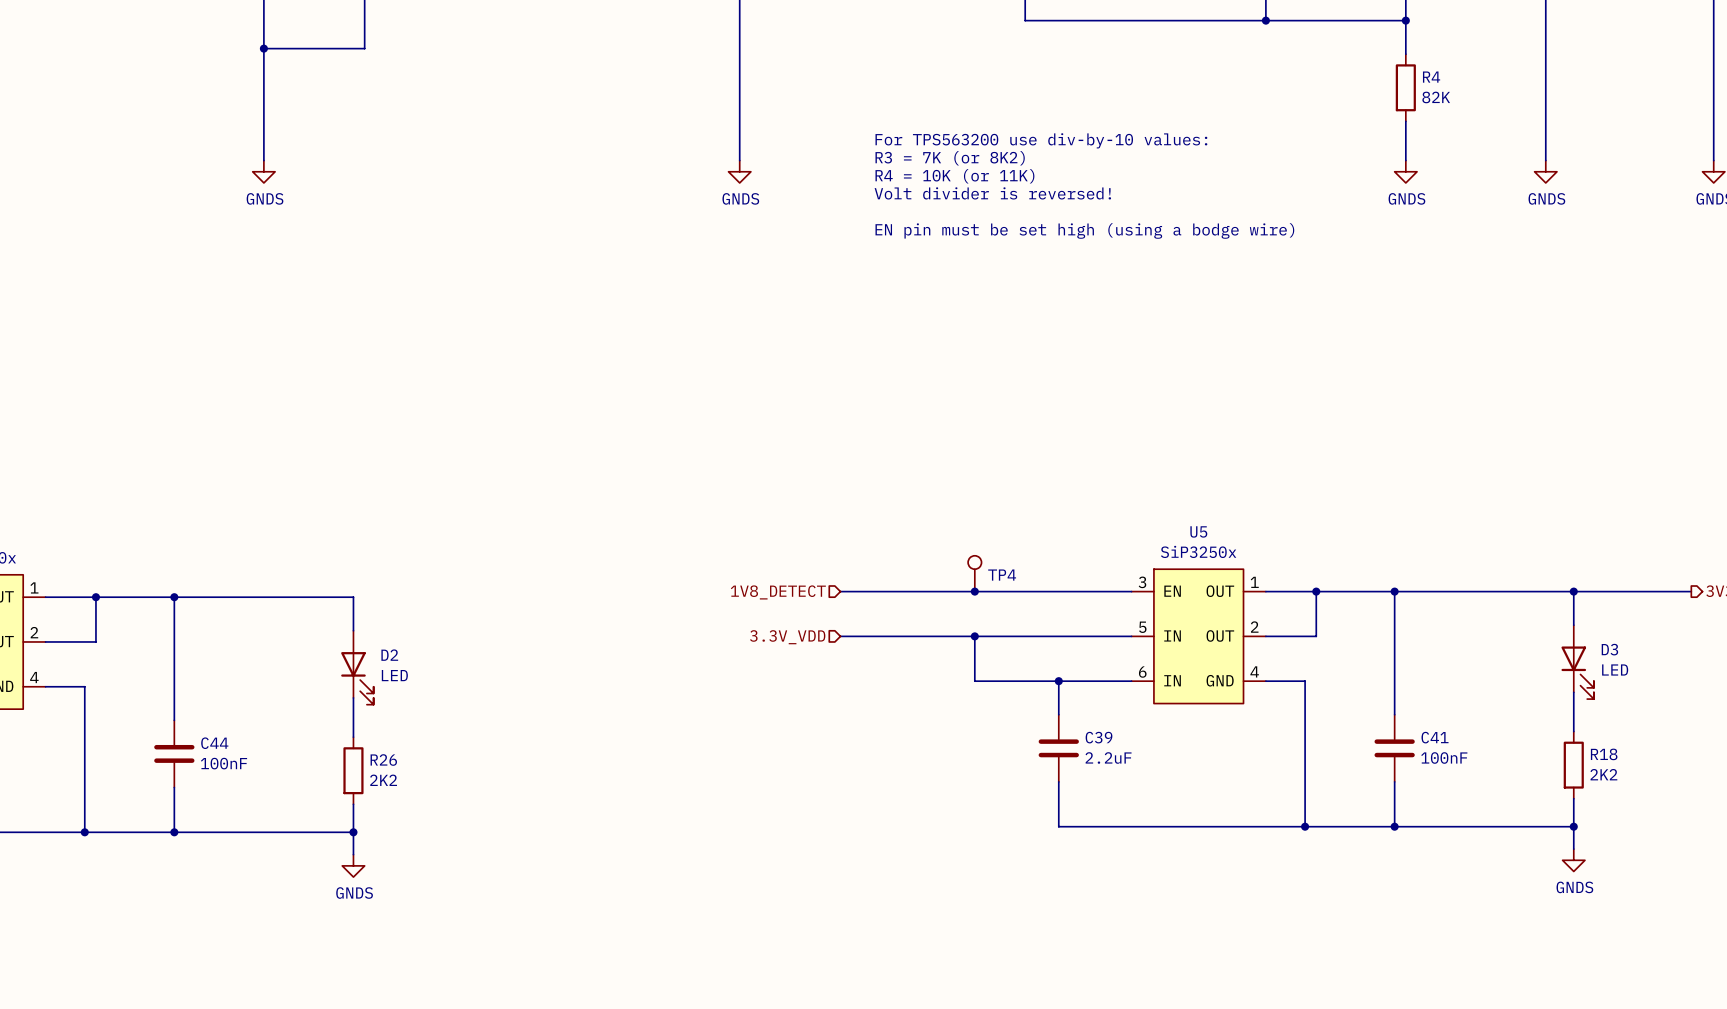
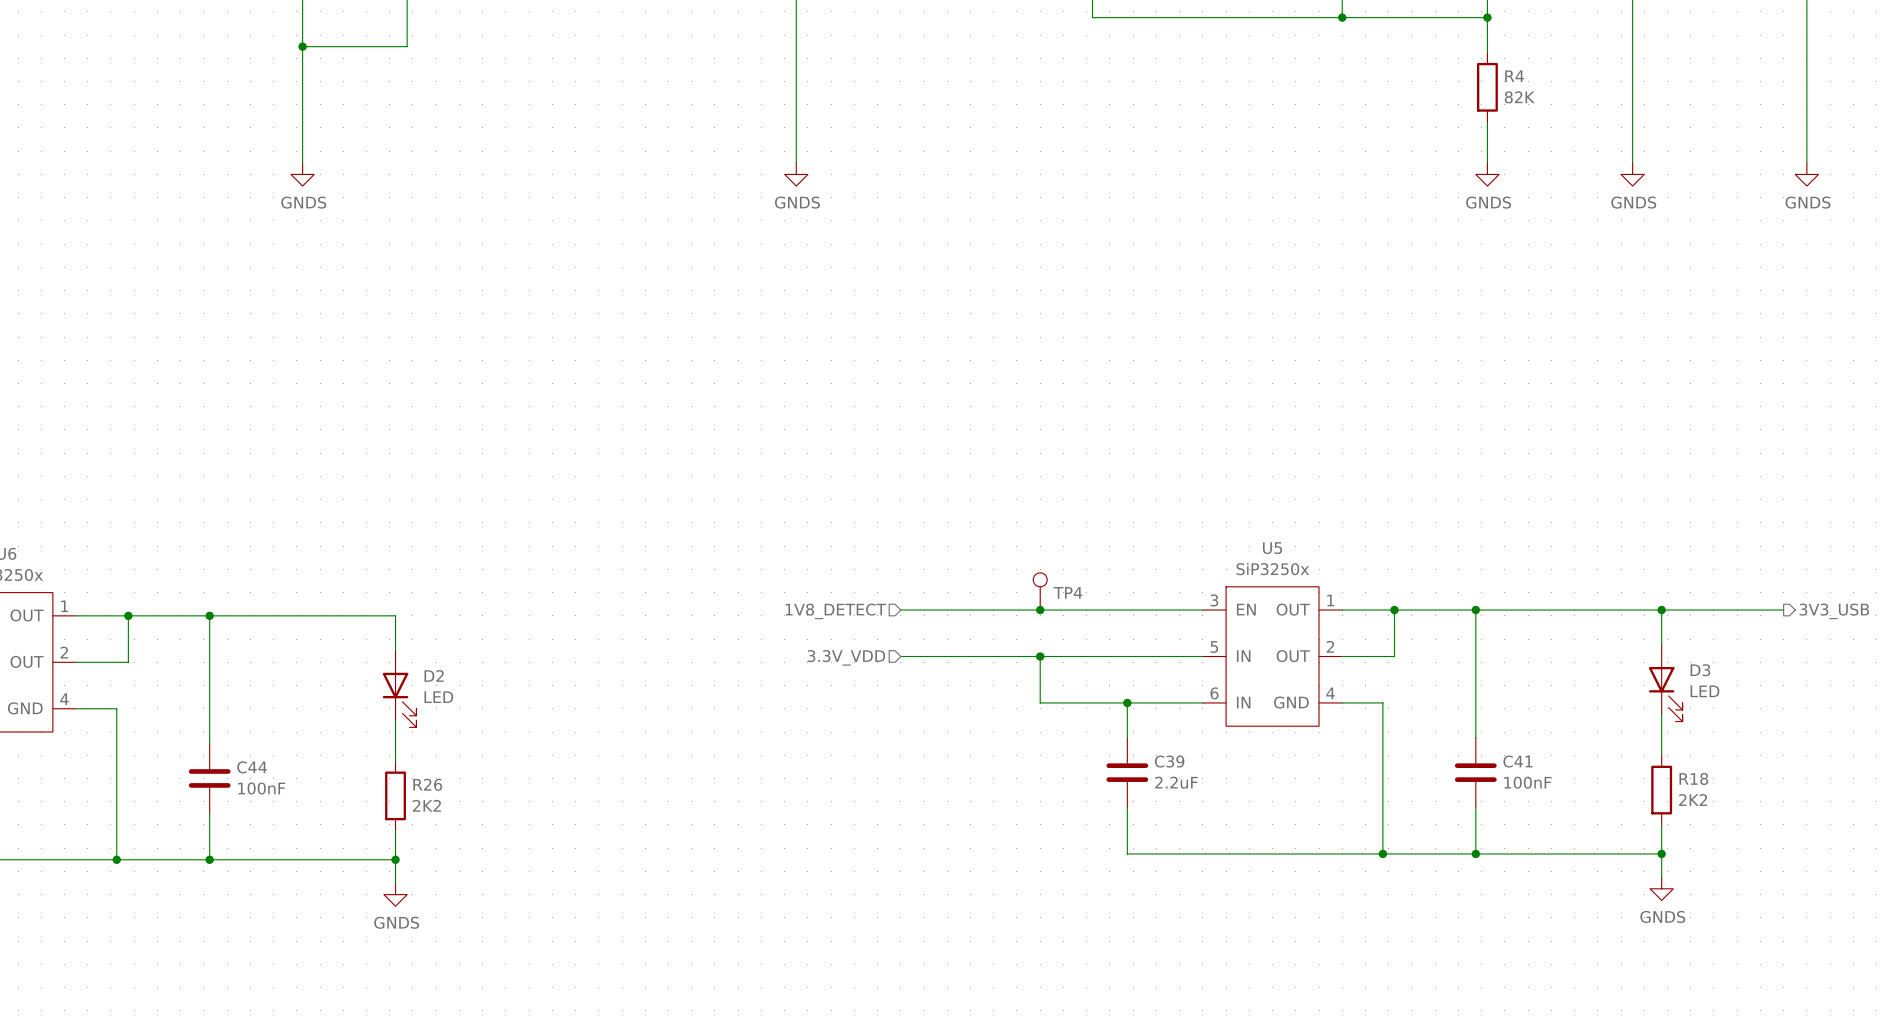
text: For TPS563200 use div-by-10 values: (1041, 140) -> none
text: R3 = 7K (or 8K2) (950, 158) -> none
text: R4 = 10K (or 11K) (954, 176) -> none
text: Volt divider is reversed! (992, 193) -> none
text: EN pin must be set high (using a bodge wire) (1084, 230) -> none

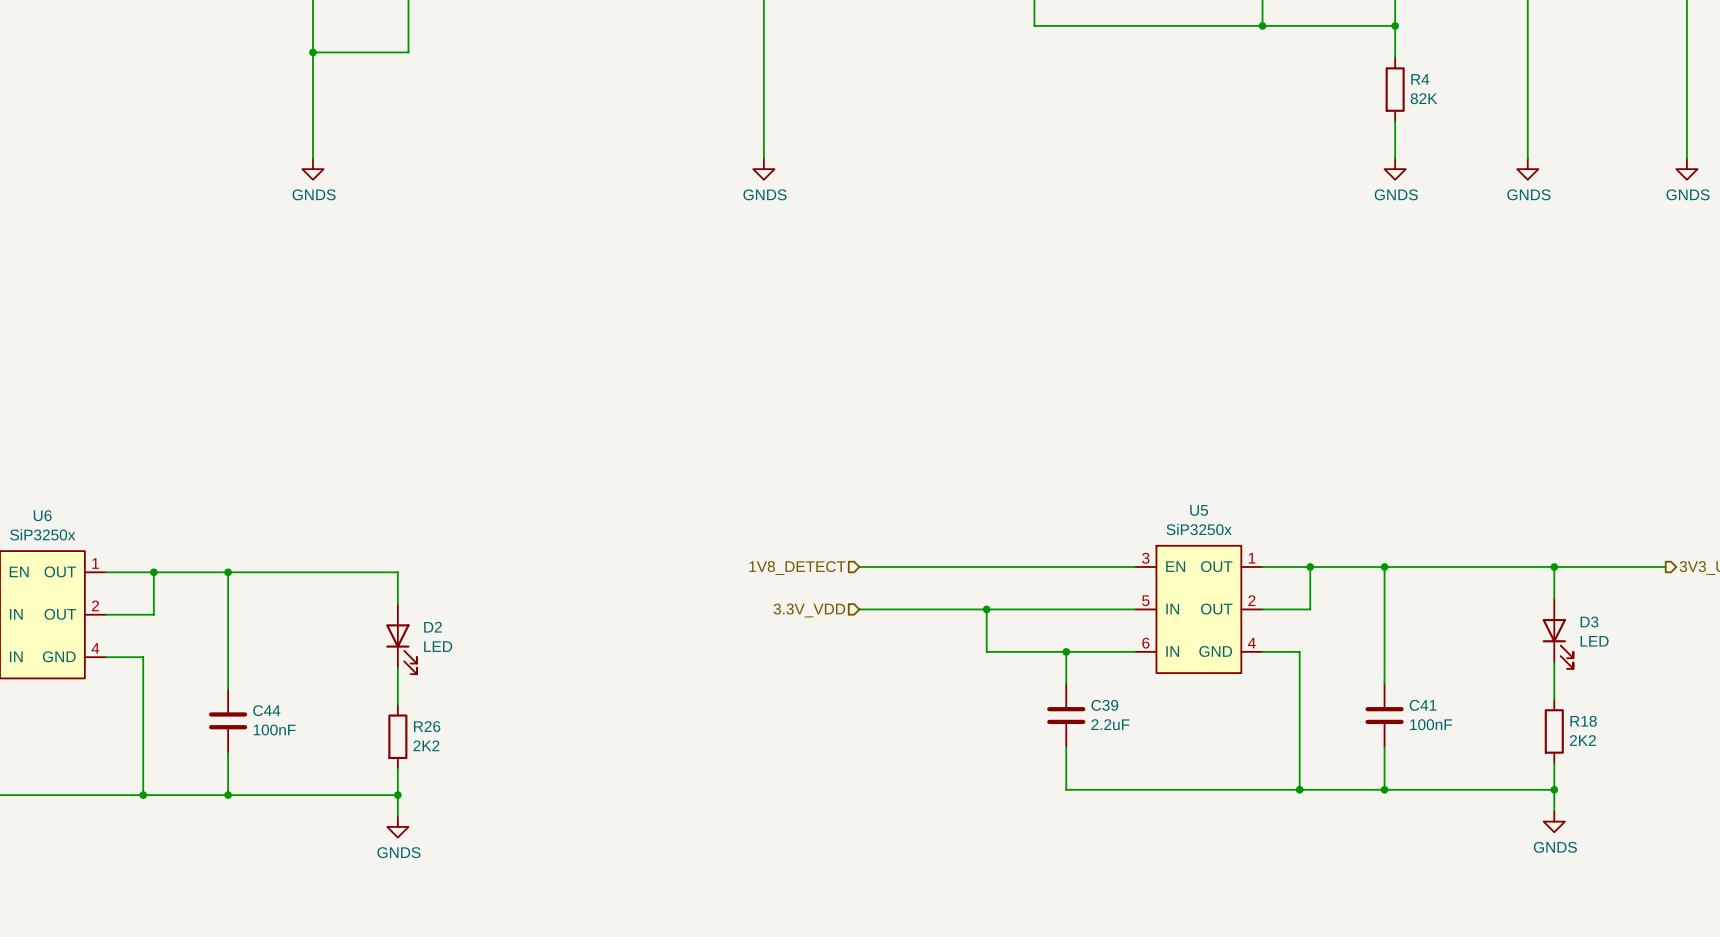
TP4: (1040, 591) -> none
junction: (1040, 610) -> none

